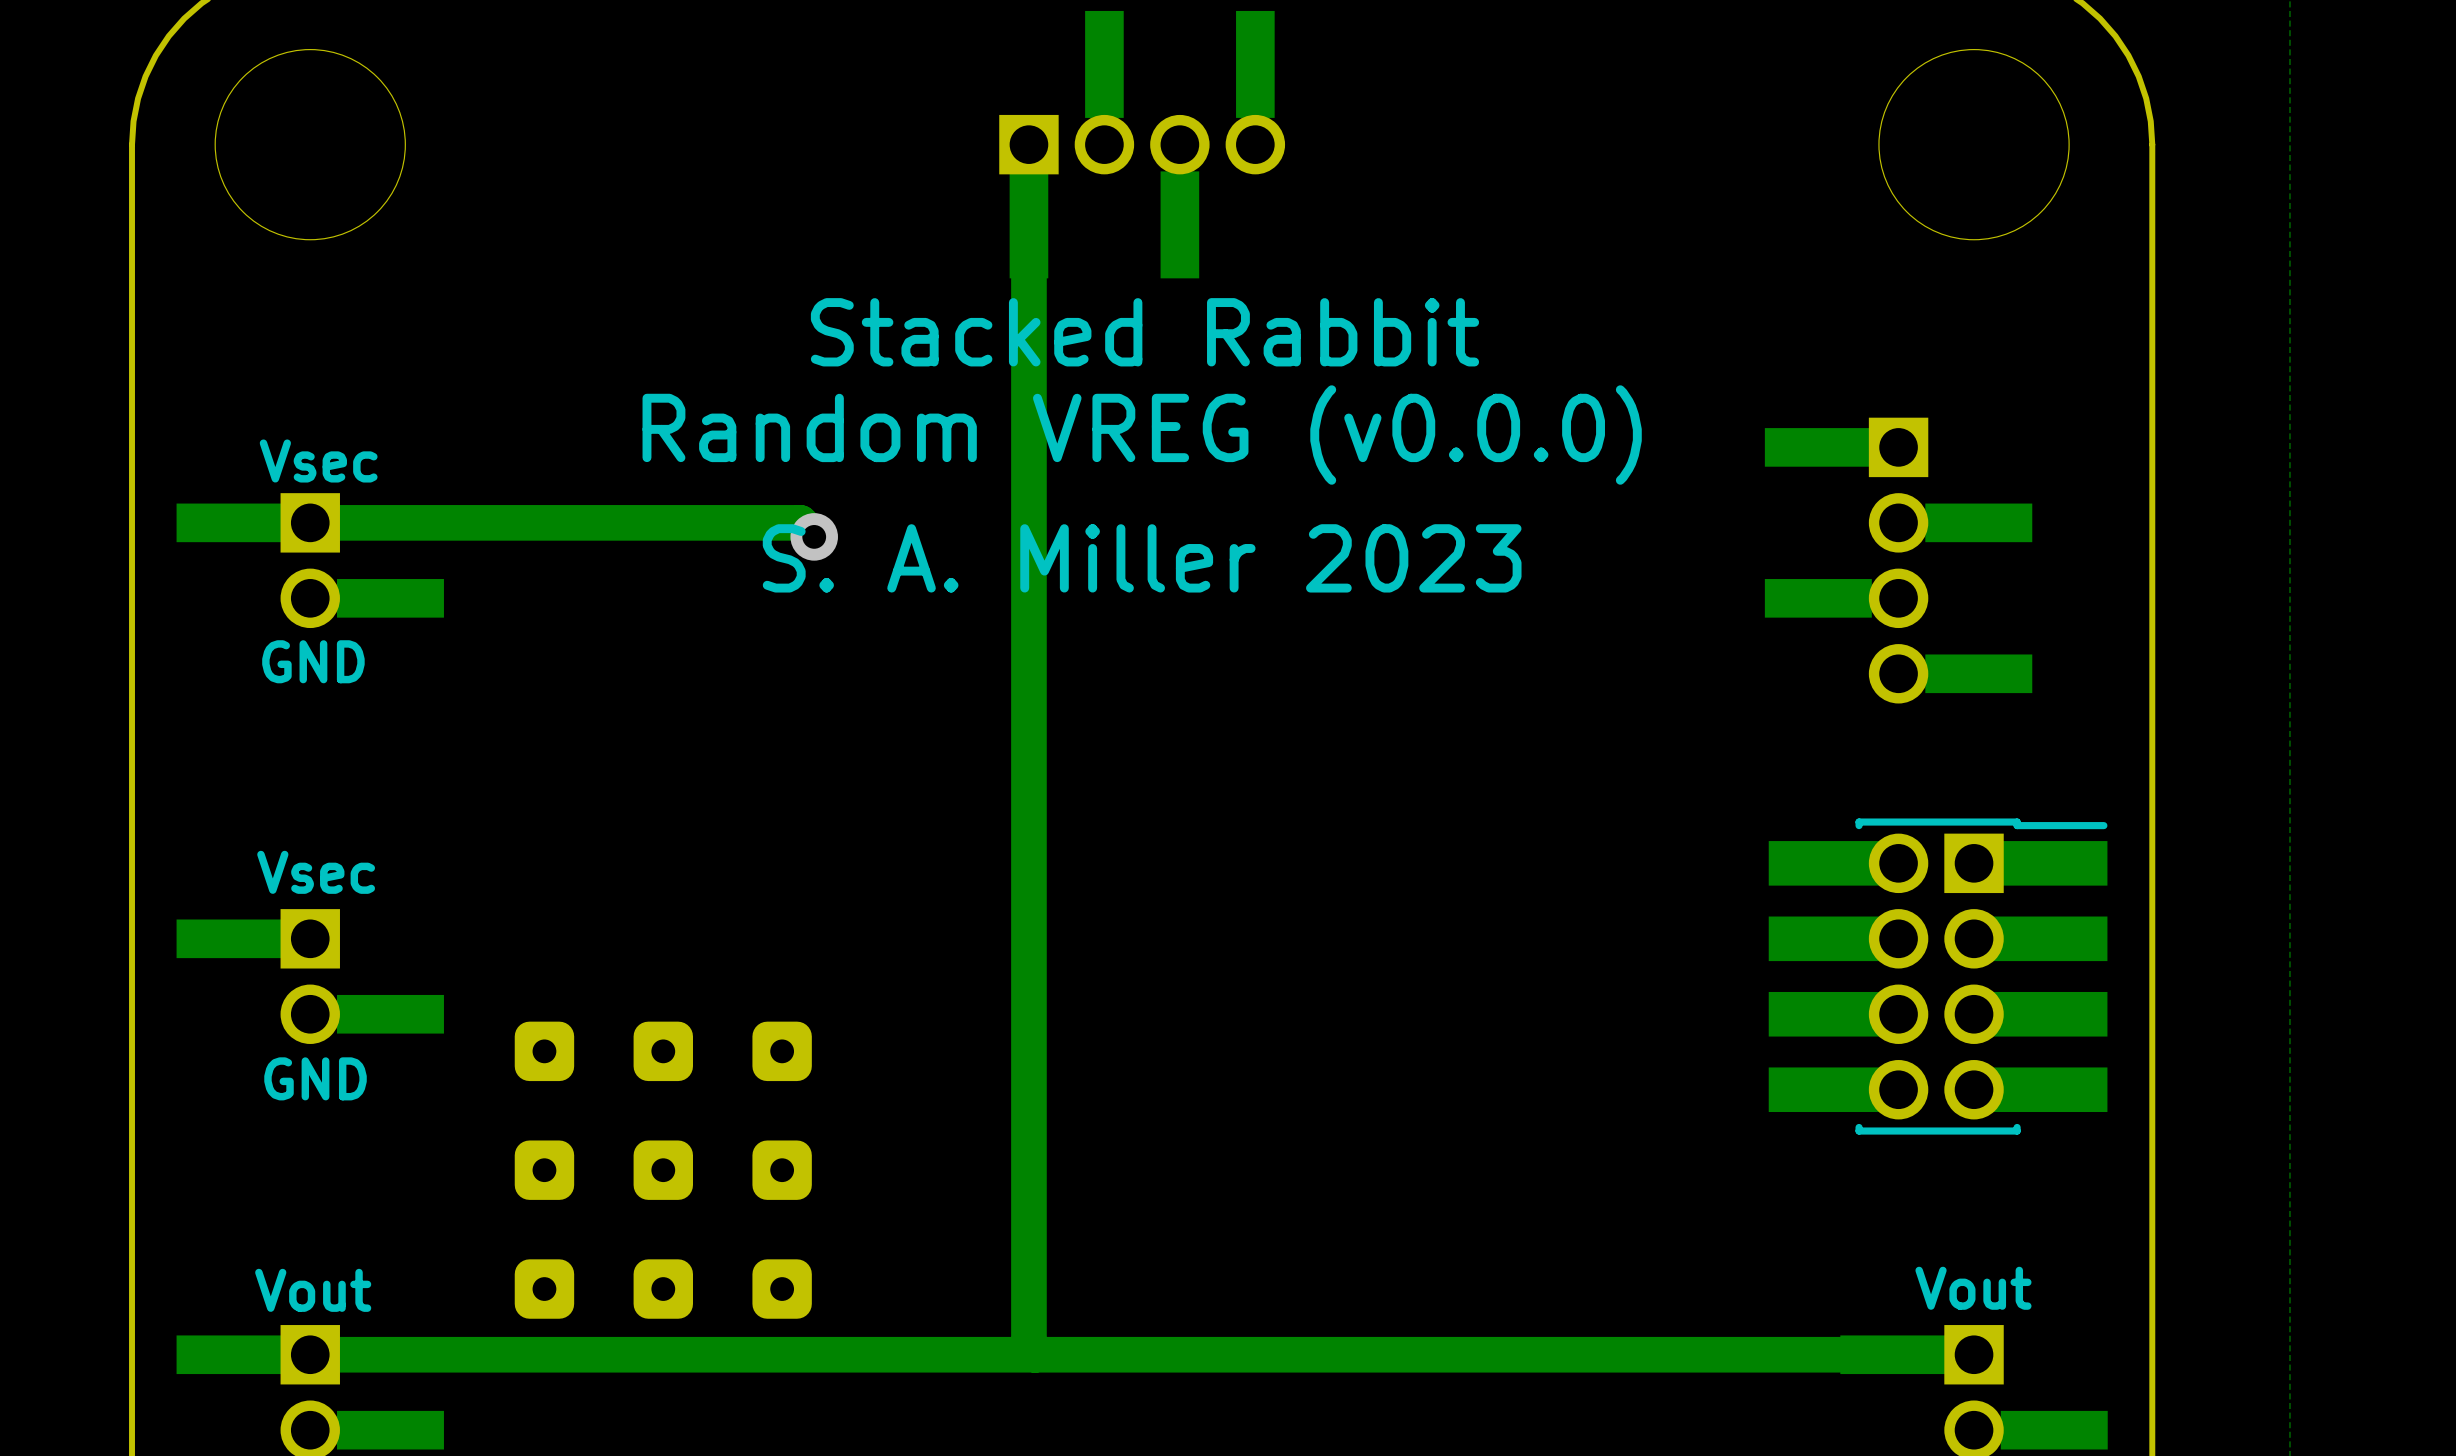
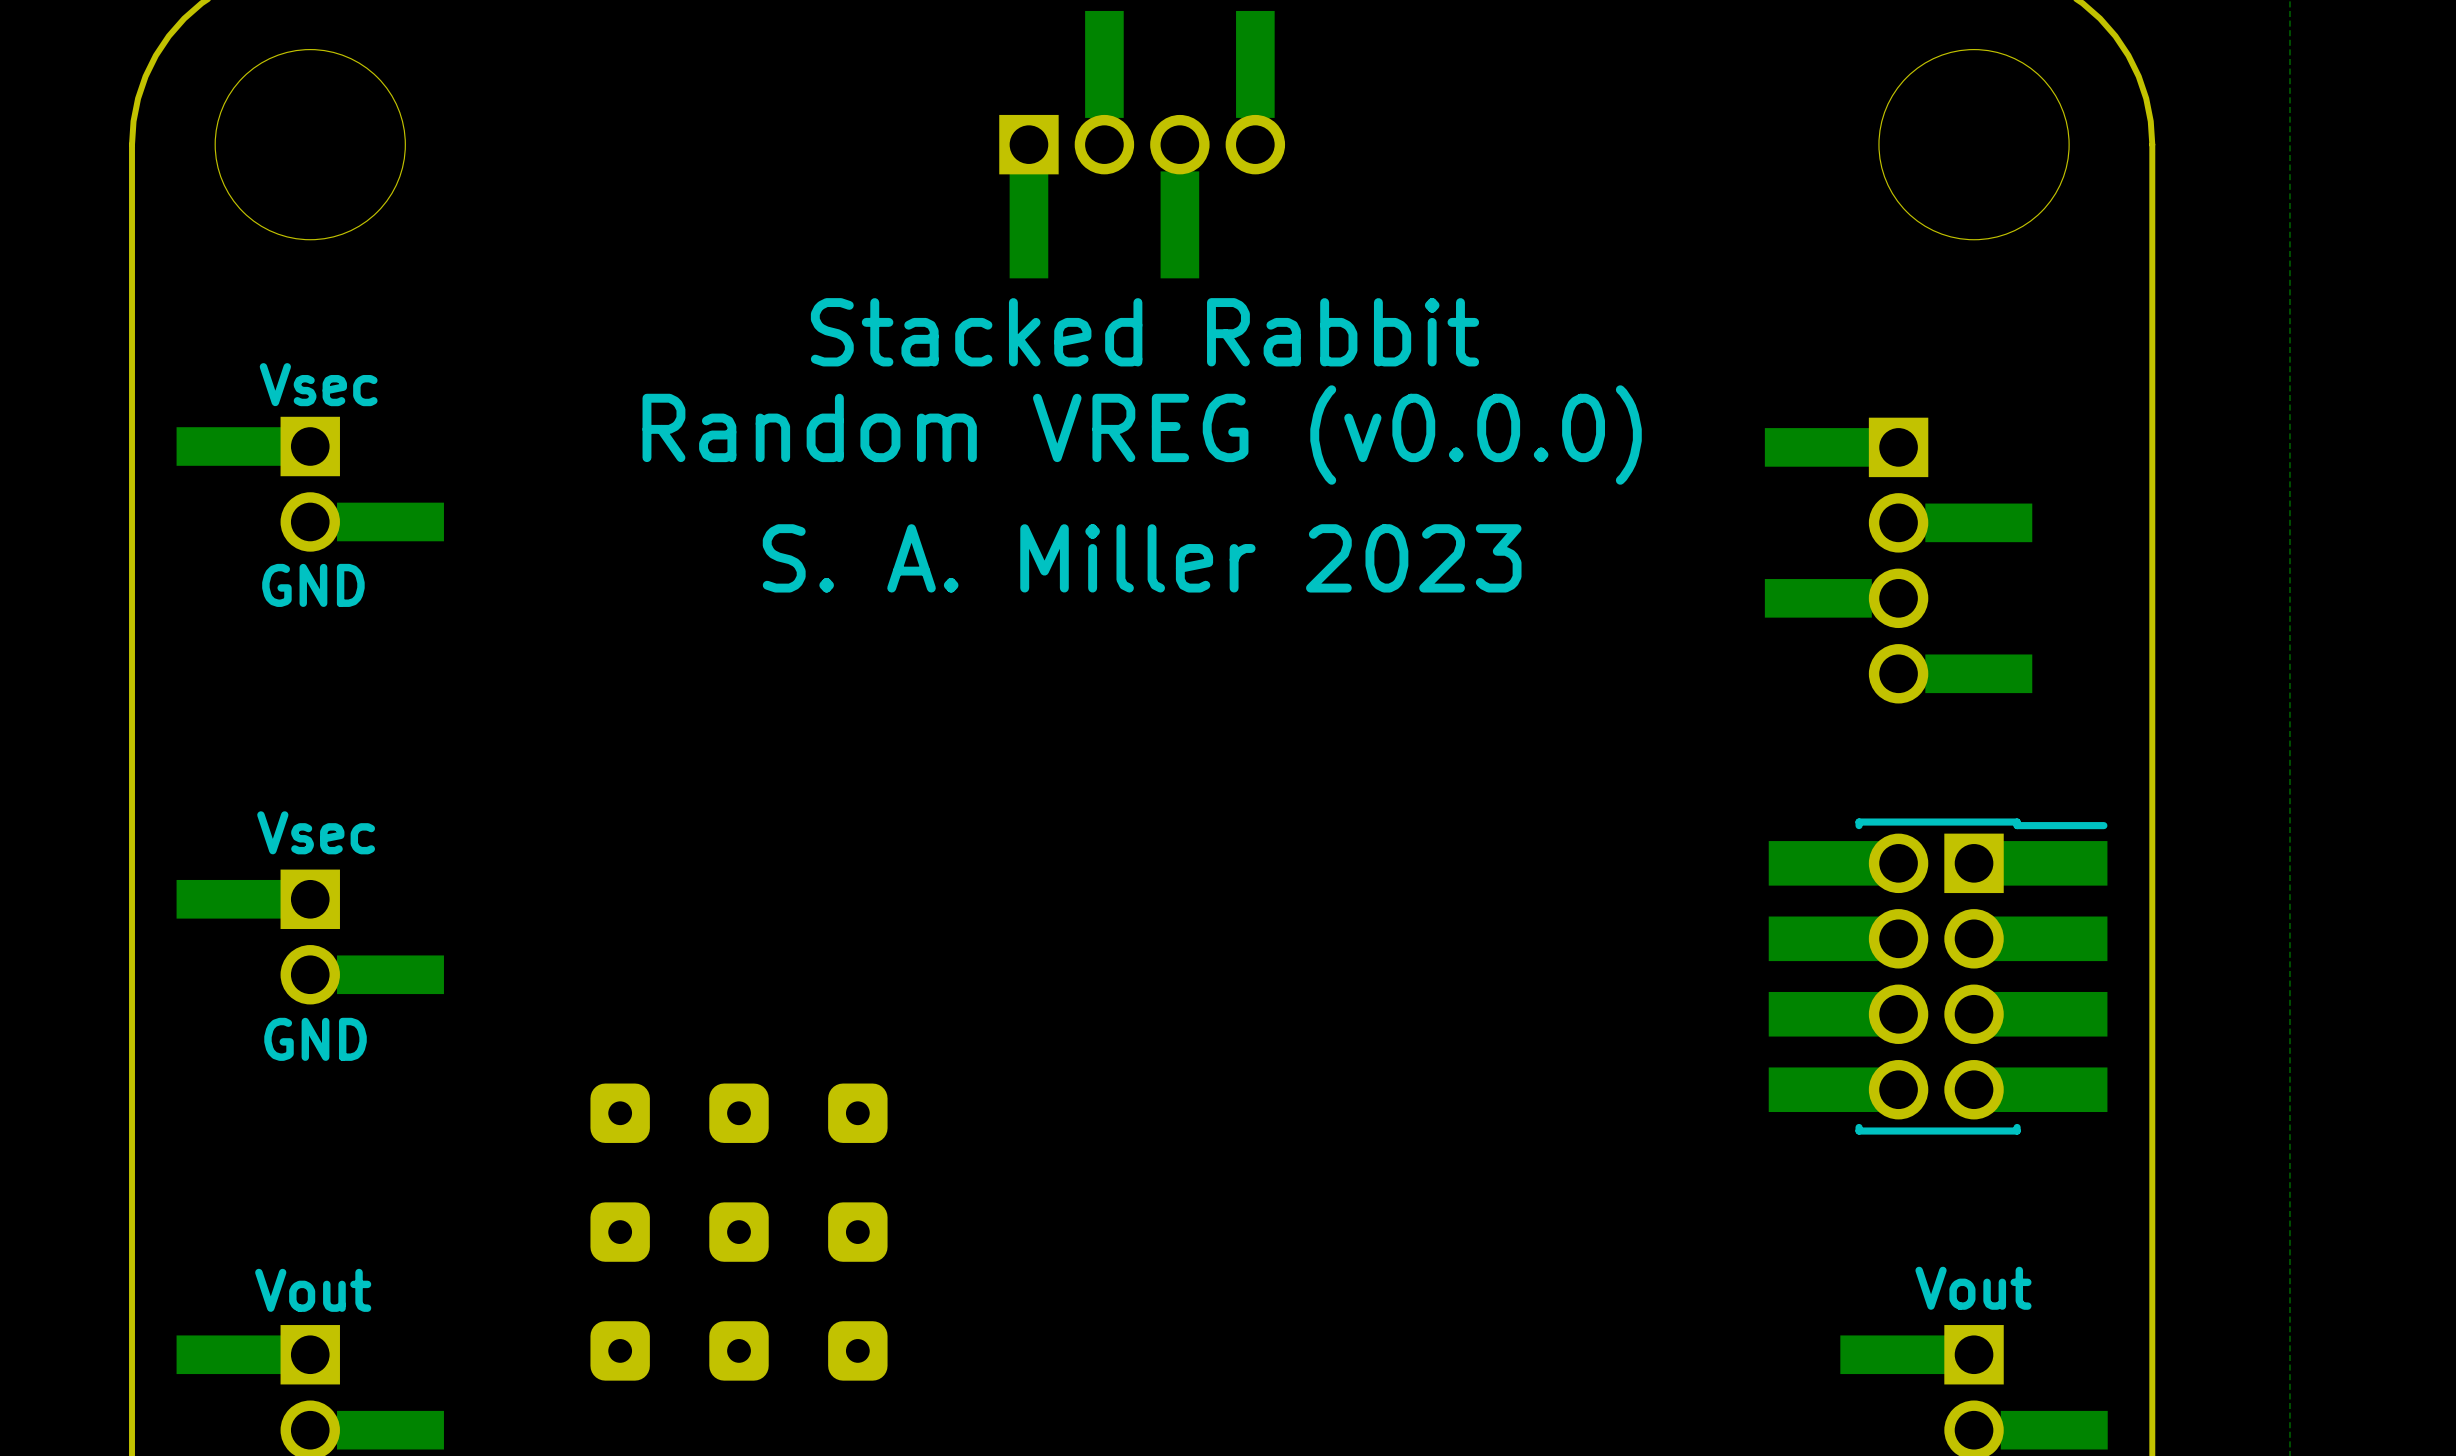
track: (1028, 144) (1028, 1348) (1035, 1354) -> none
text position: Vsec (318, 460) -> Vsec (318, 384)
track: (310, 522) (800, 522) (814, 536) -> none
via: (814, 536) -> none
part position: (310, 560) -> (310, 484)
text position: GND (313, 661) -> GND (313, 585)
text position: Vsec (316, 872) -> Vsec (316, 832)
part position: (310, 976) -> (310, 937)
text position: GND (315, 1078) -> GND (315, 1039)
part position: (663, 1170) -> (739, 1232)
track: (1974, 1354) (310, 1354) -> none

